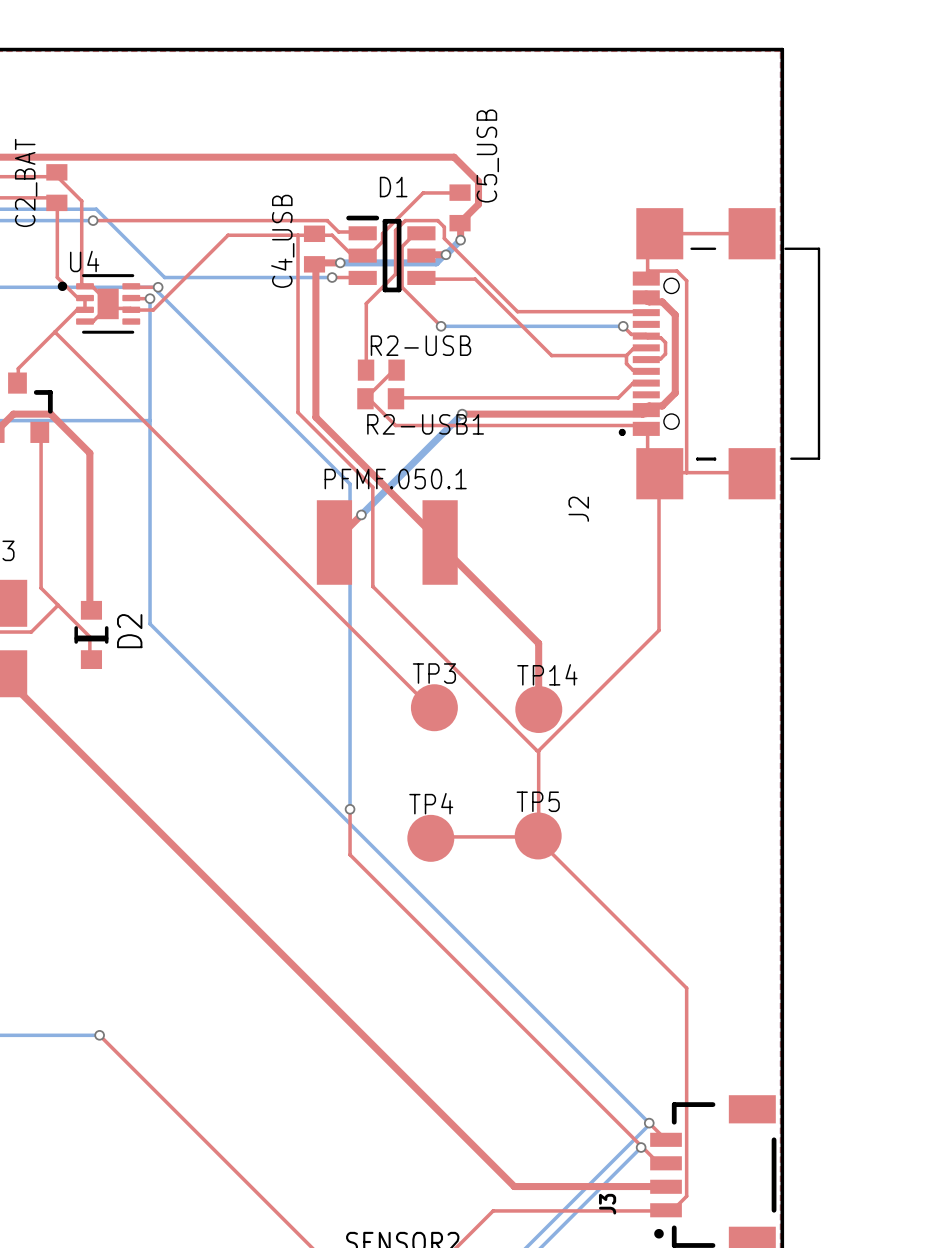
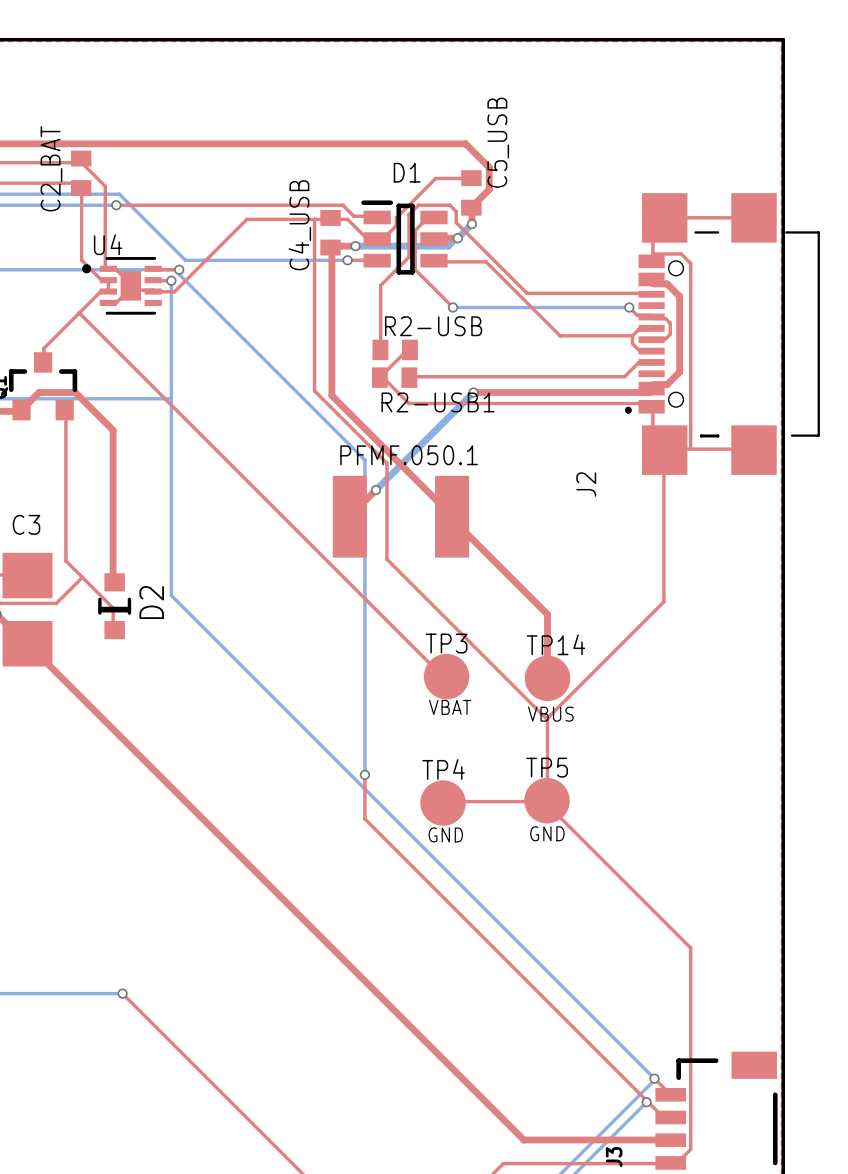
TP3 text: none -> VBAT (450, 707)
TP14 text: none -> VBUS (550, 714)
TP5 text: none -> GND (547, 833)
TP4 text: none -> GND (445, 834)

